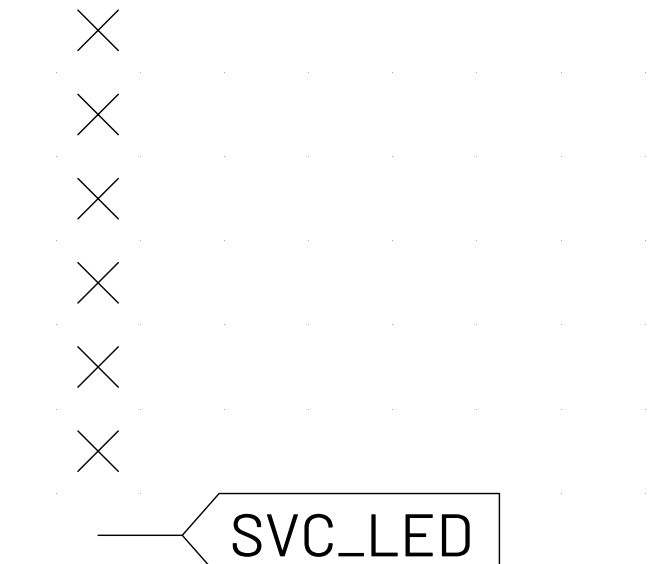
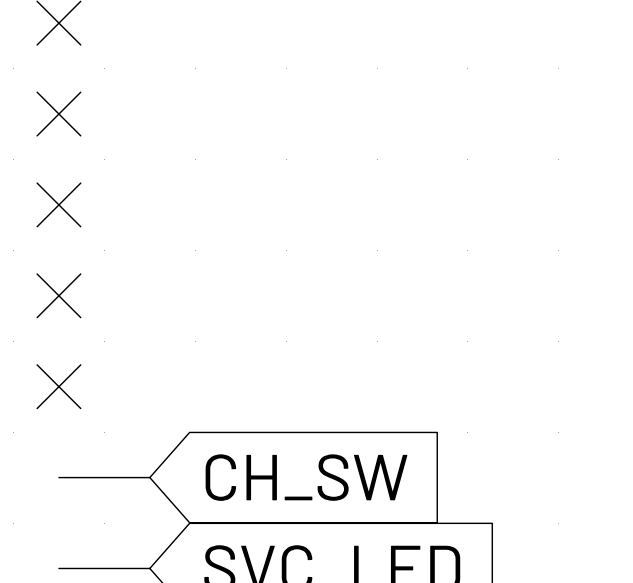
wire: none -> (58, 477) (149, 477)
no-connect mark: (98, 451) -> none
global label: none -> CH_SW (306, 477)

